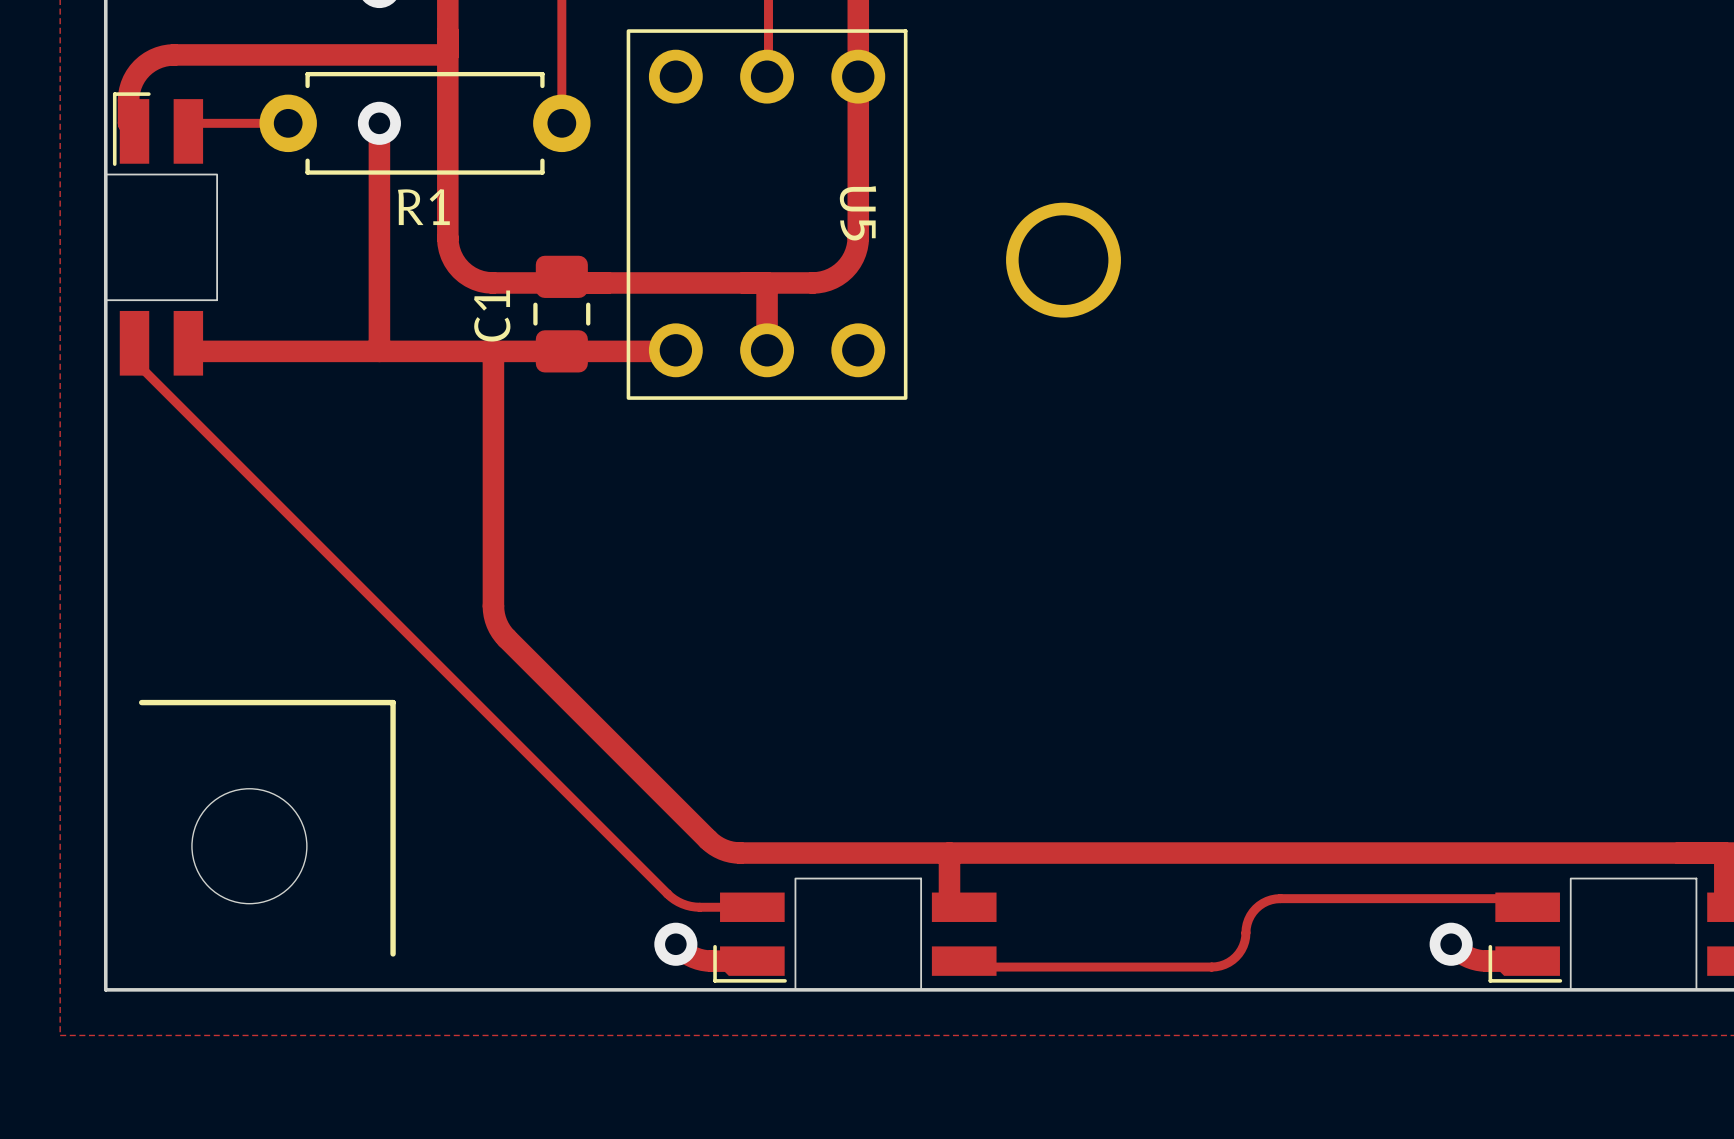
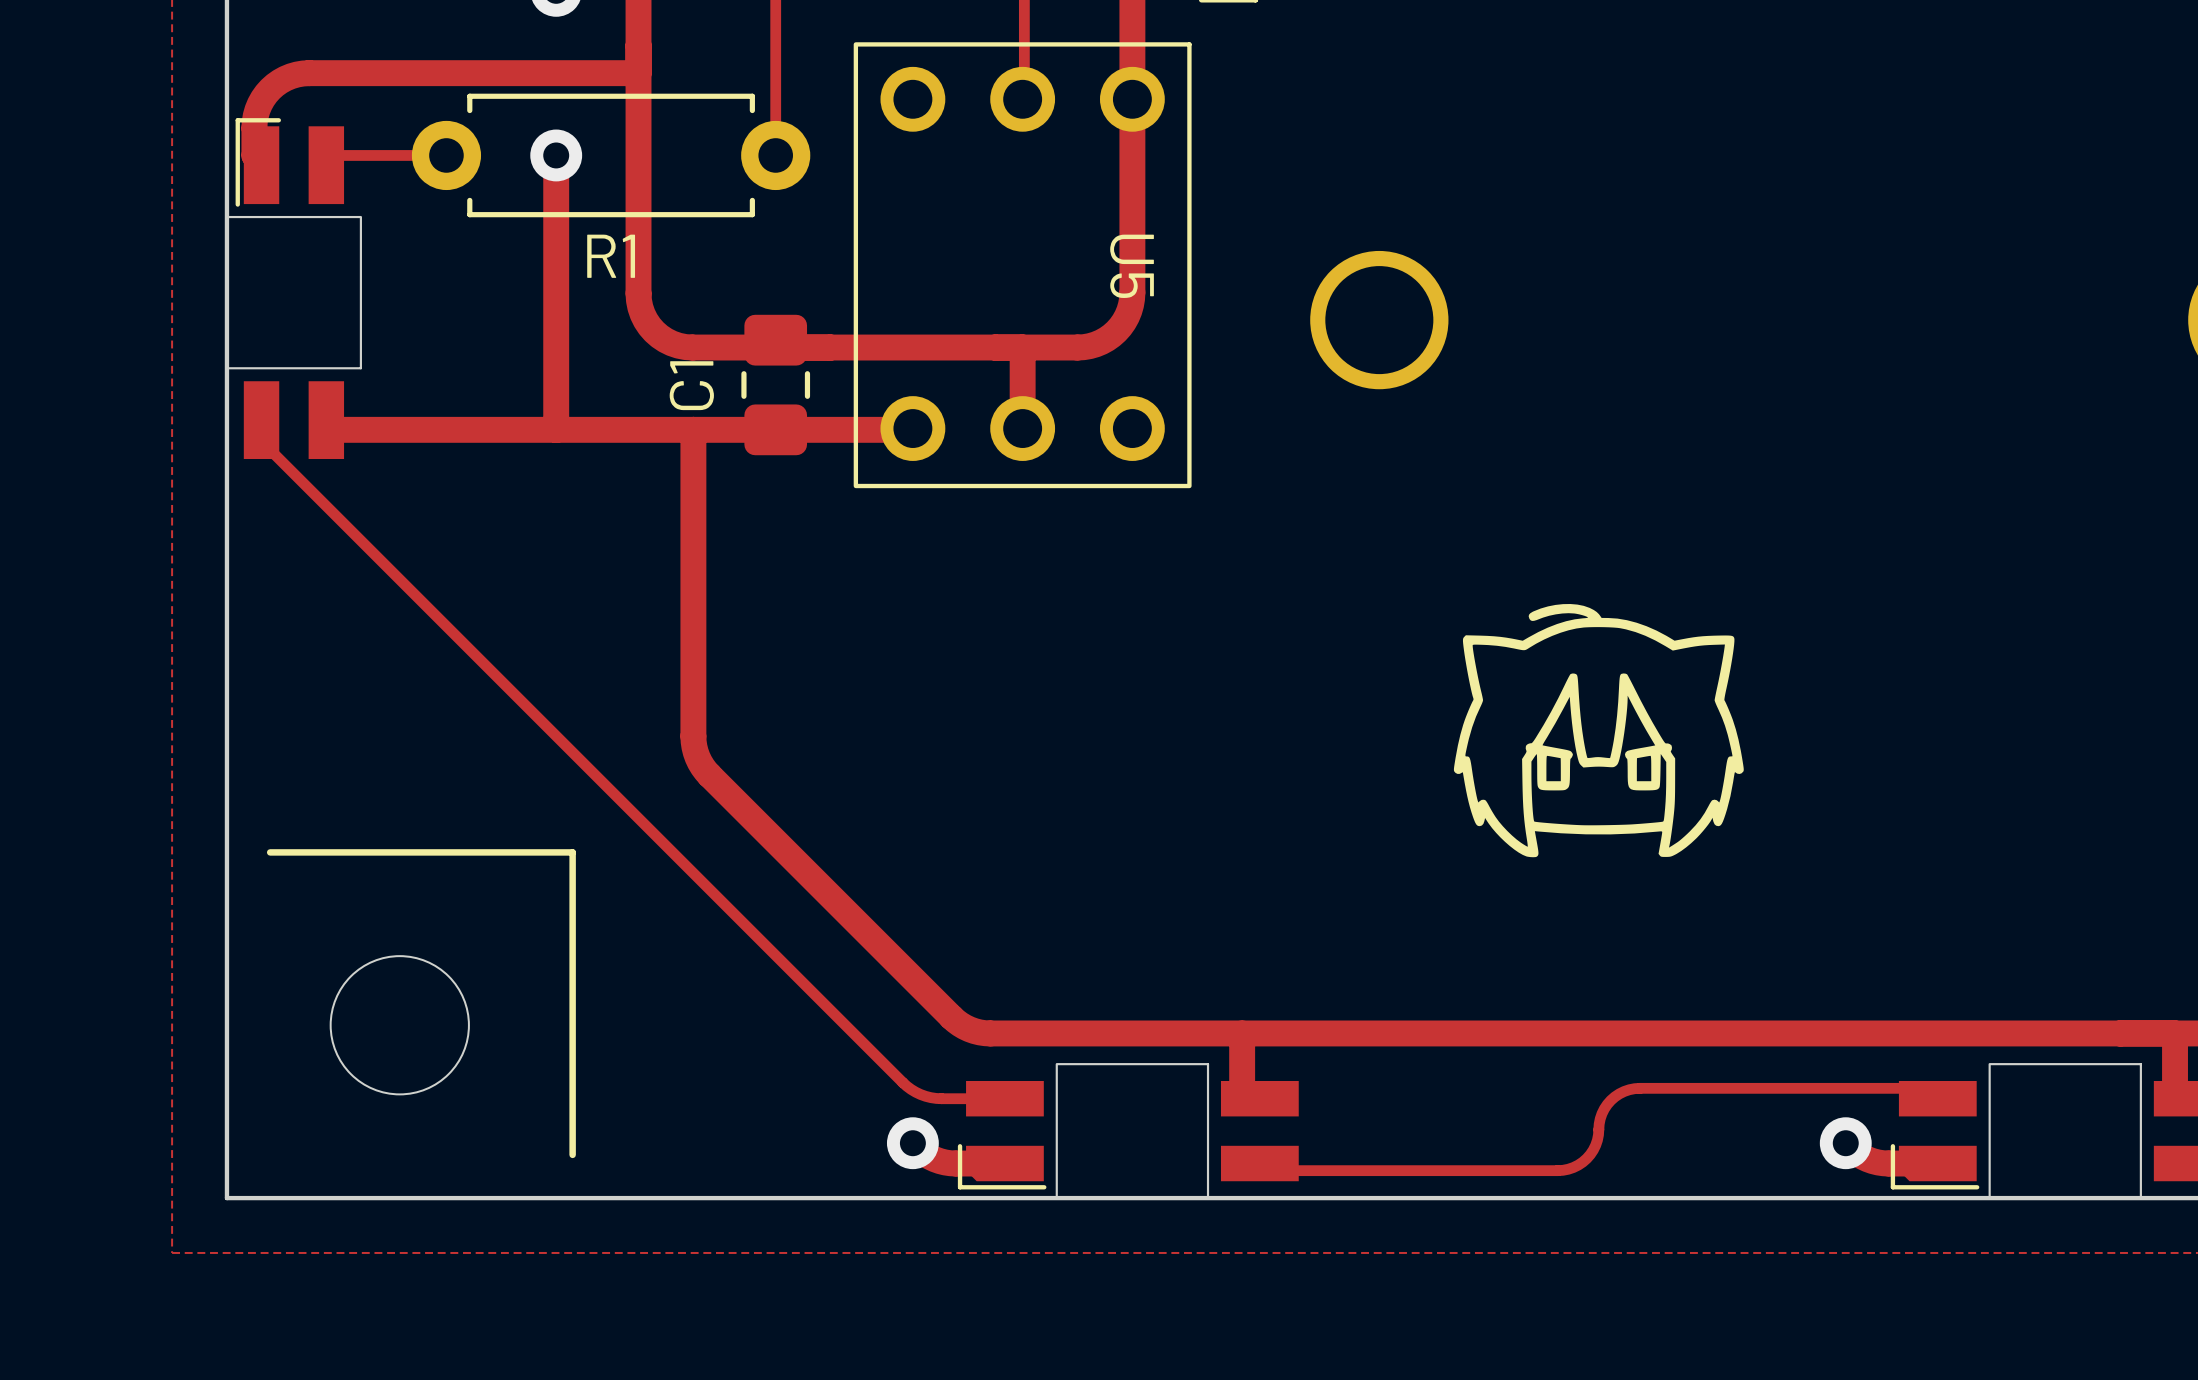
drawing: none -> [1453, 604, 1744, 858]

